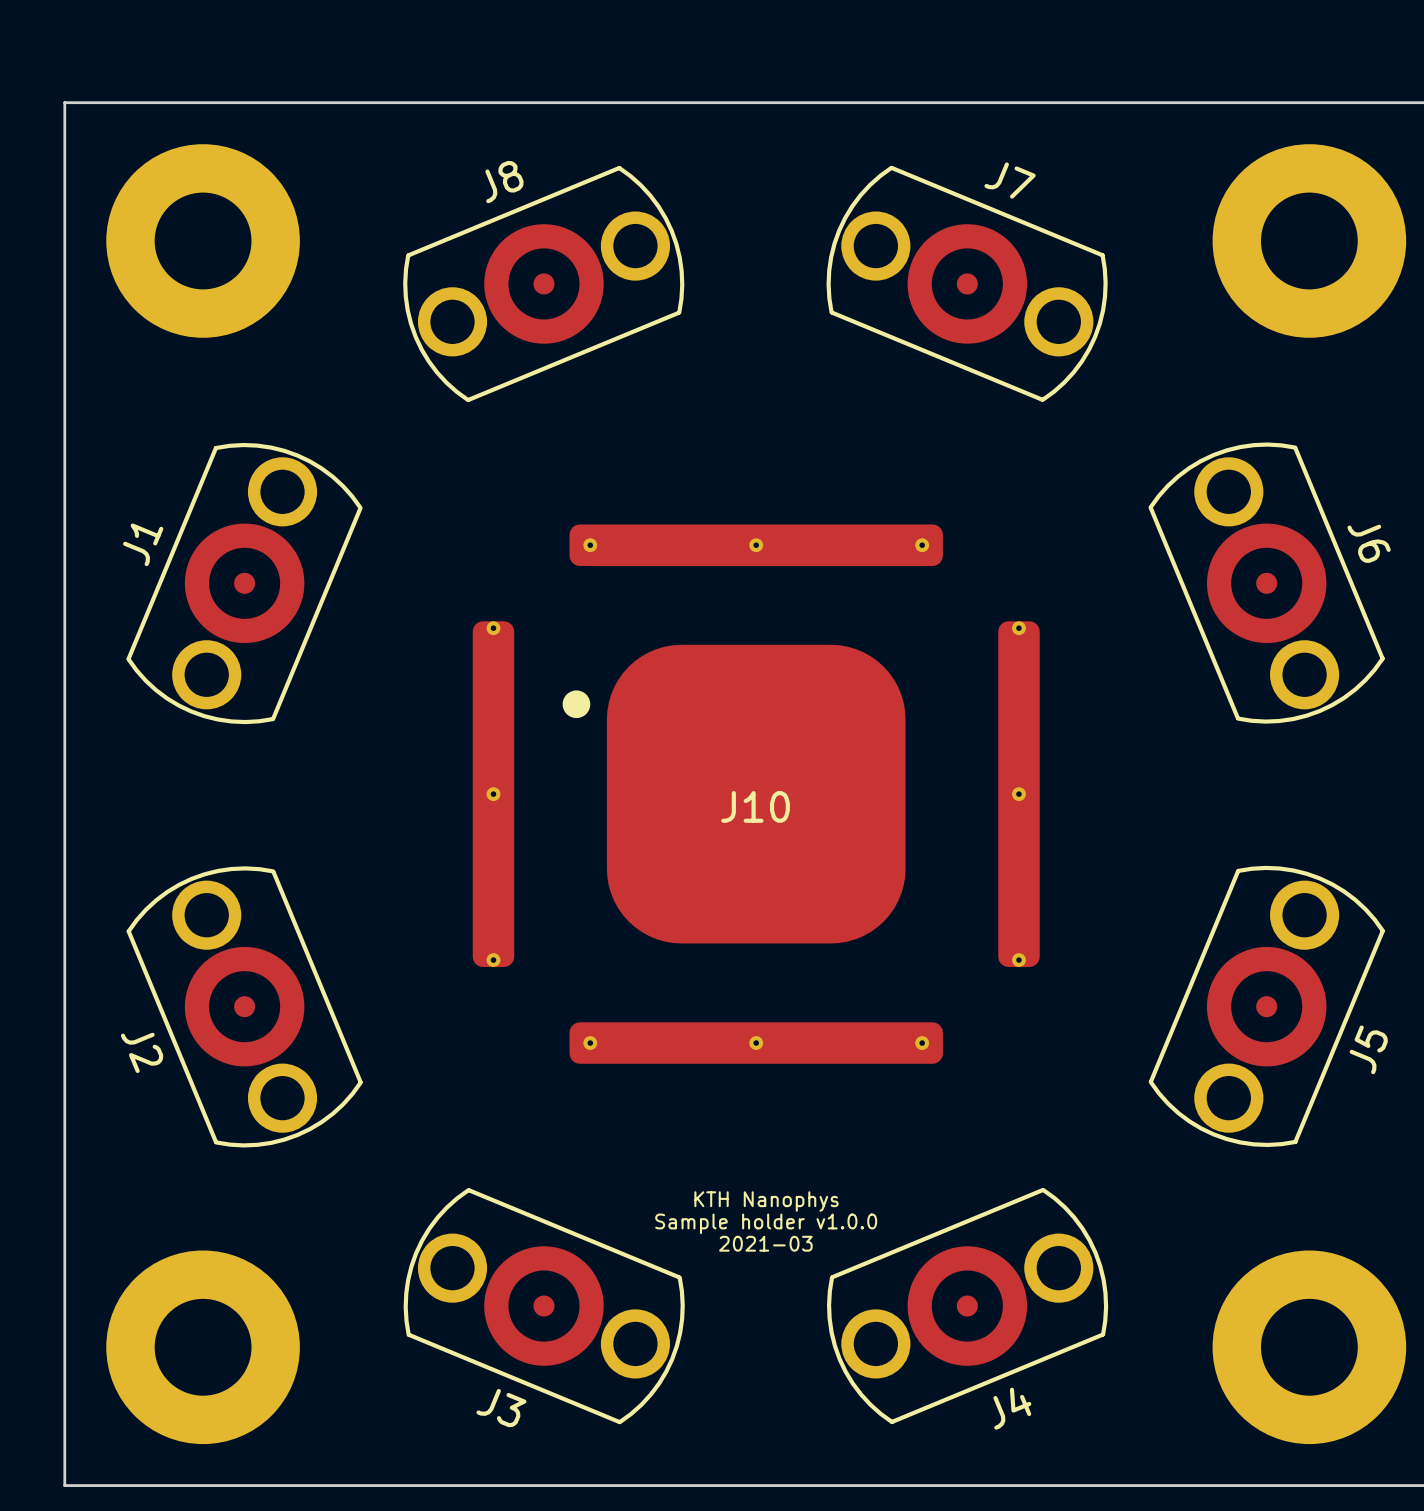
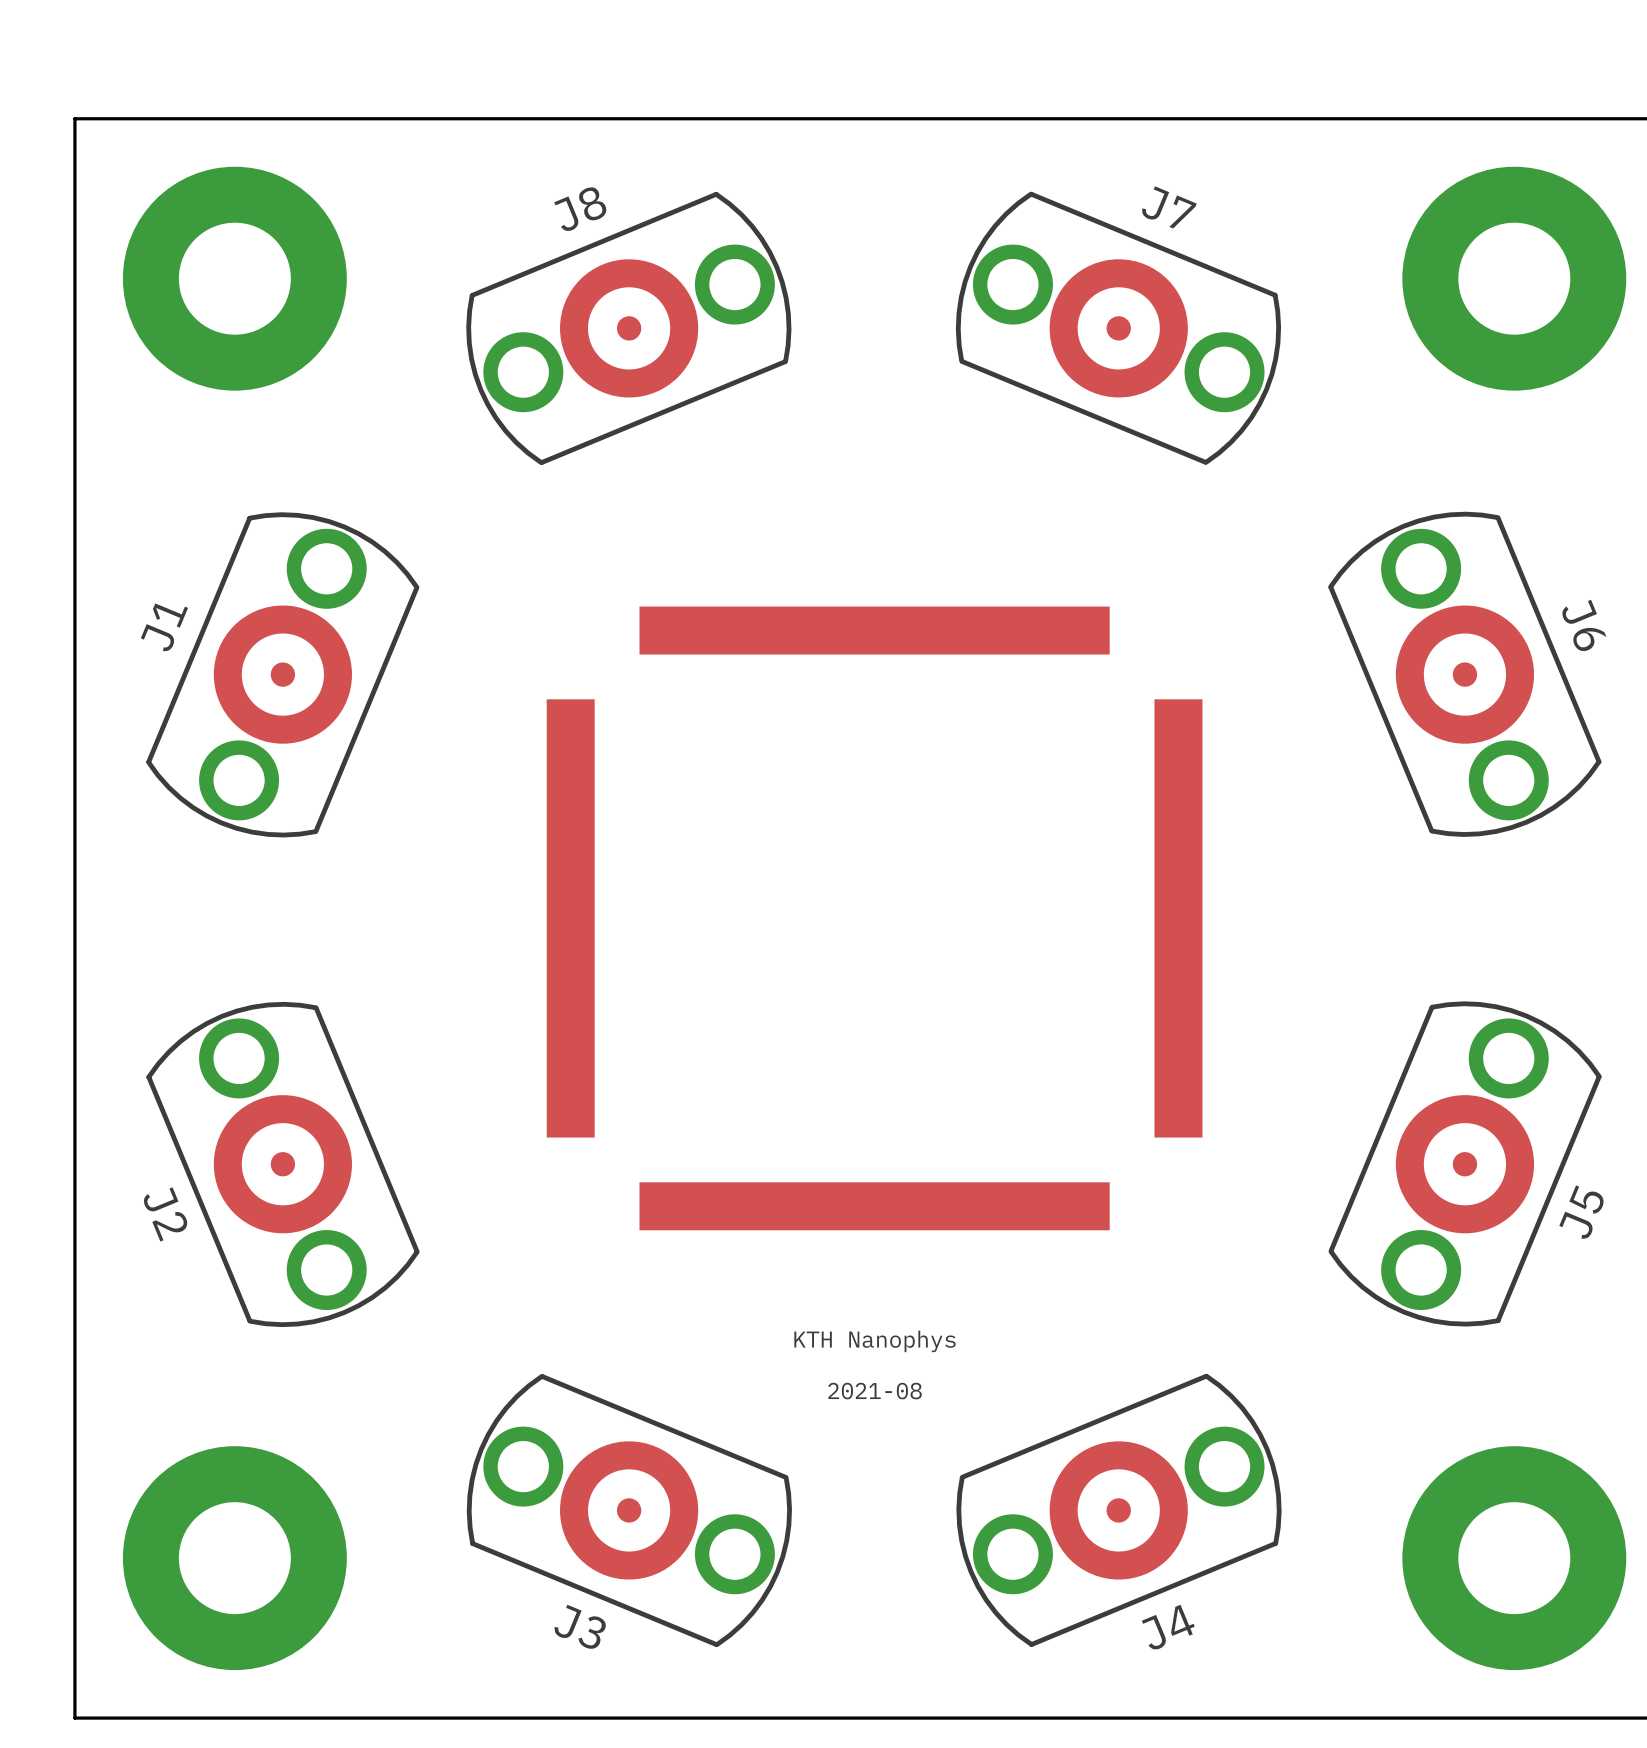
part footprint: [562, 644, 906, 944] -> [546, 606, 1203, 1231]
J10: (756, 794) -> none
text position: KTH Nanophys (766, 1201) -> KTH Nanophys (875, 1341)
text: none -> 2021-08 (875, 1391)
text: Sample holder v1.0.0 (766, 1223) -> none
text: 2021-03 (765, 1243) -> none

